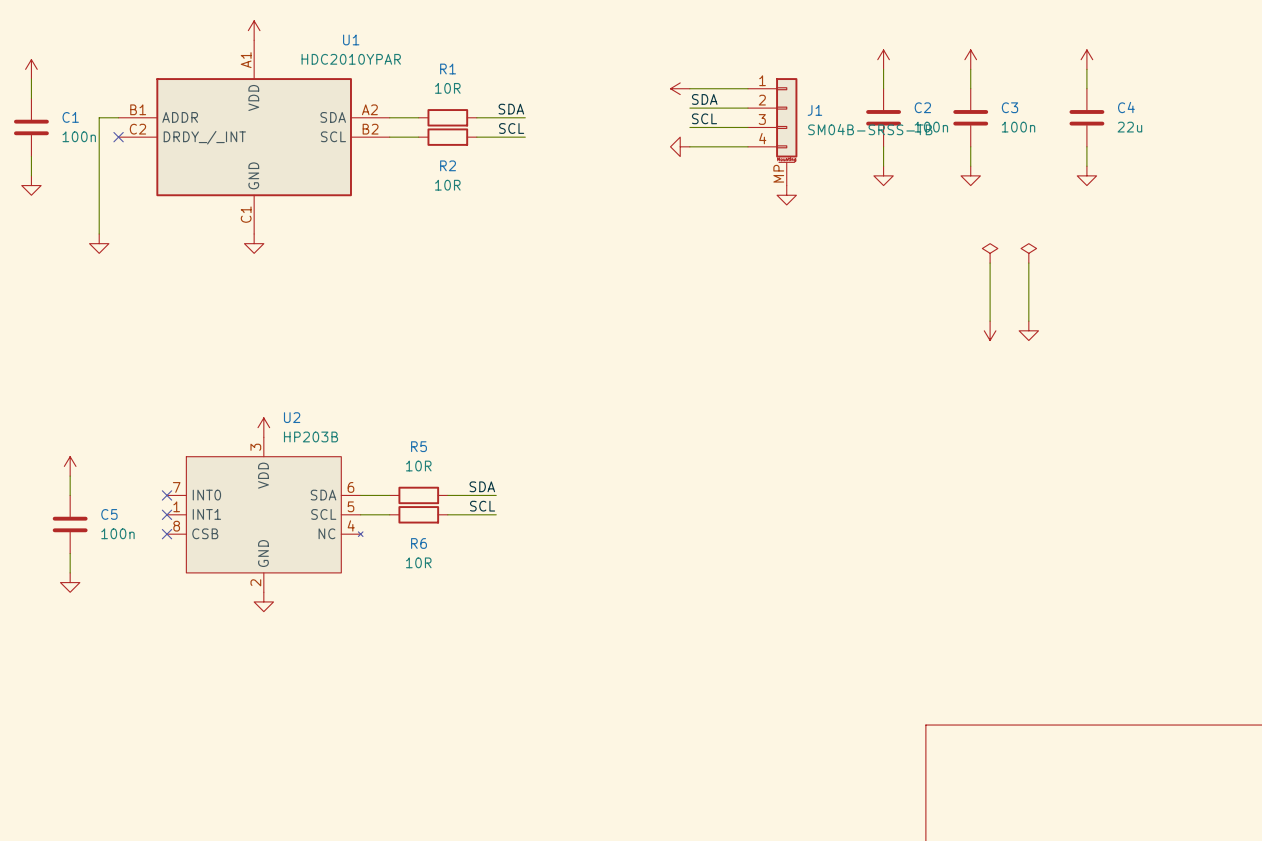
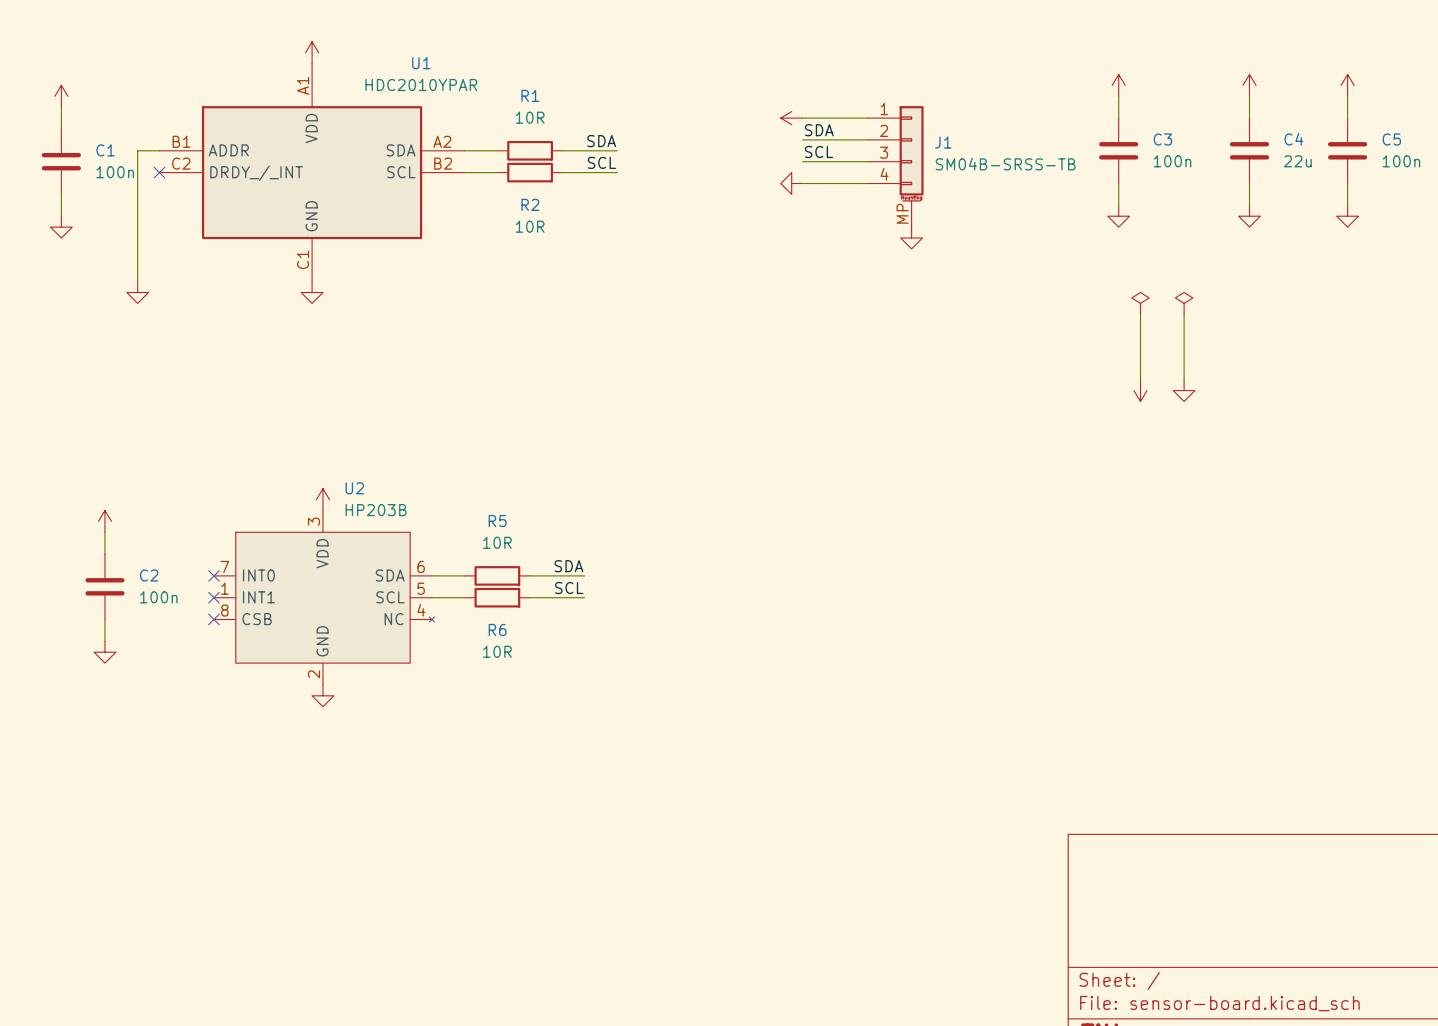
power symbol: (883, 59) -> none
power symbol: none -> (1347, 85)
wire: (883, 69) (883, 88) -> none
wire: none -> (1347, 96) (1347, 118)
C2 position: (883, 117) -> (104, 586)
wire: (883, 146) (883, 166) -> none
wire: none -> (1347, 183) (1347, 205)
power symbol: (883, 175) -> none
power symbol: none -> (1347, 216)
power symbol position: (70, 466) -> (104, 521)
C5 position: (70, 524) -> (1347, 150)
power symbol position: (70, 582) -> (104, 652)

